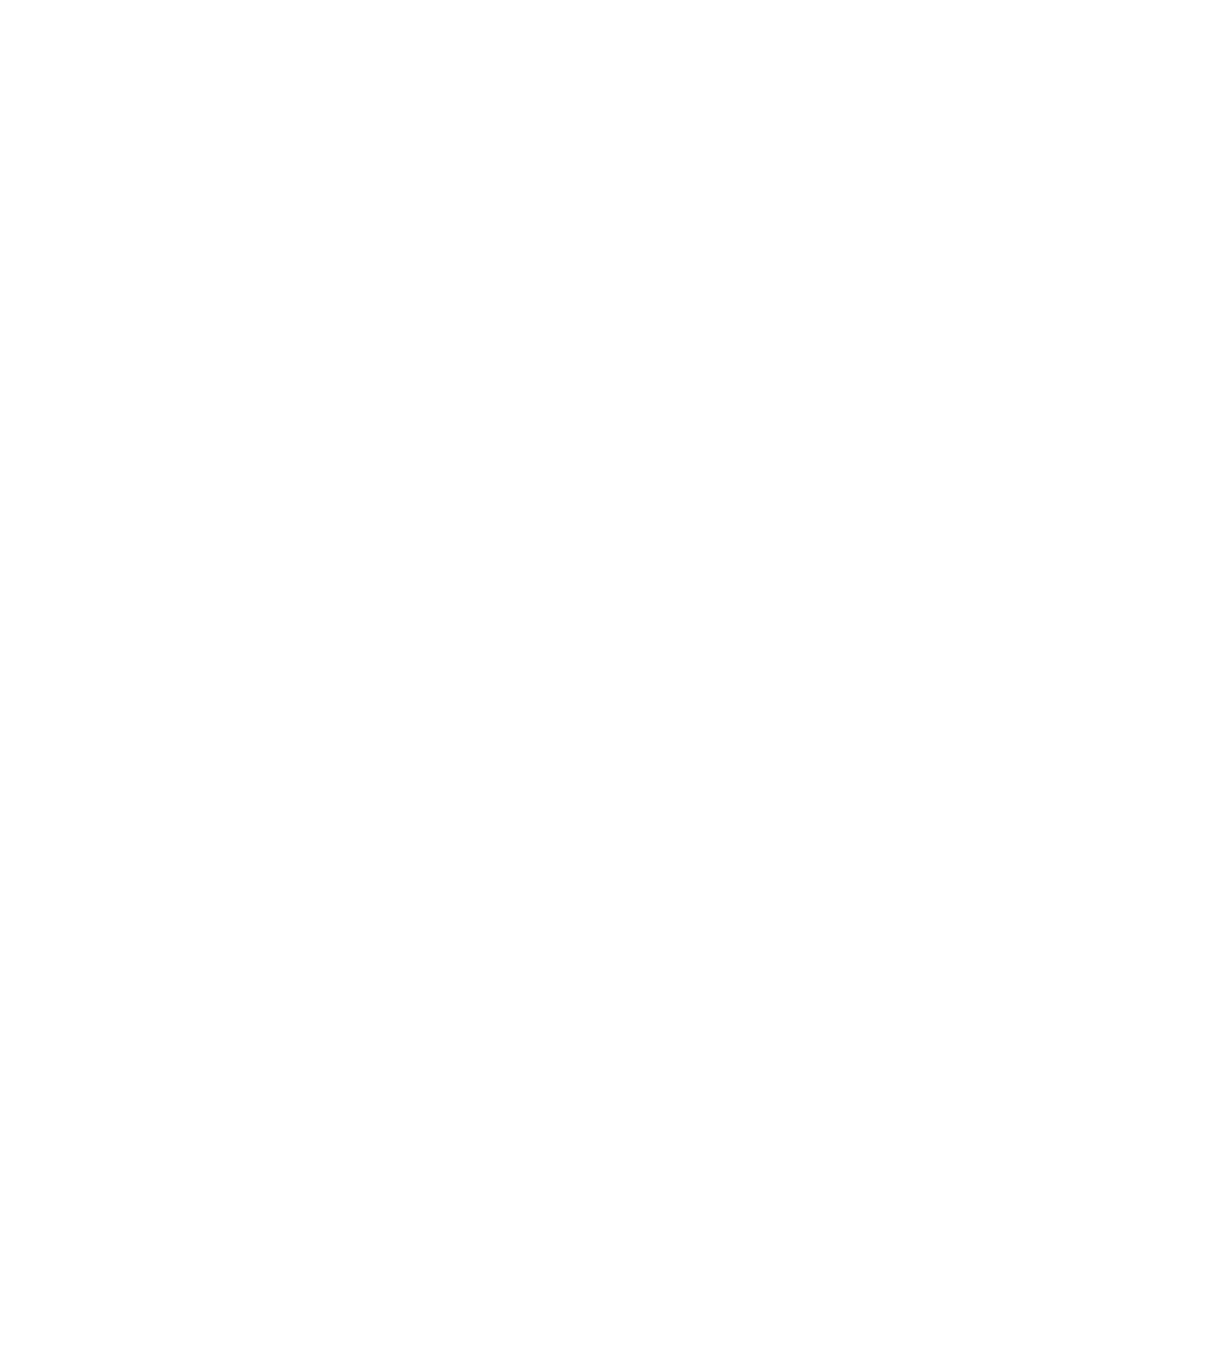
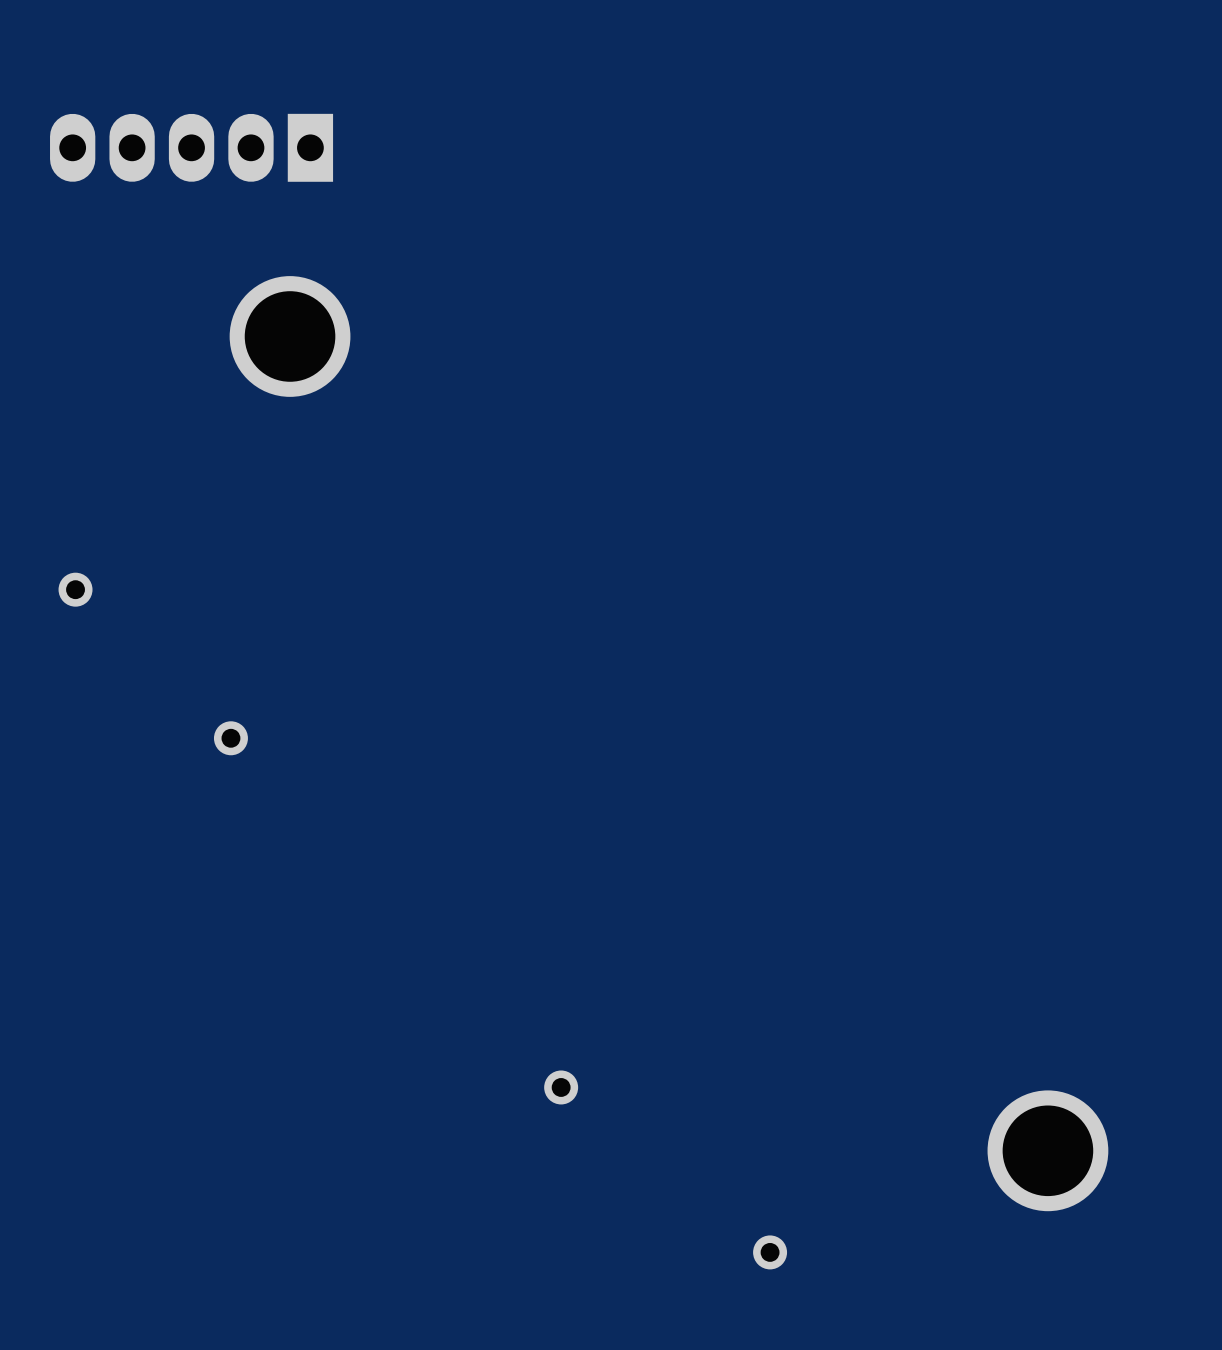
part: none -> (191, 147)
part: none -> (290, 336)
part: none -> (75, 589)
part: none -> (230, 738)
part: none -> (561, 1087)
part: none -> (1047, 1150)
part: none -> (770, 1252)

